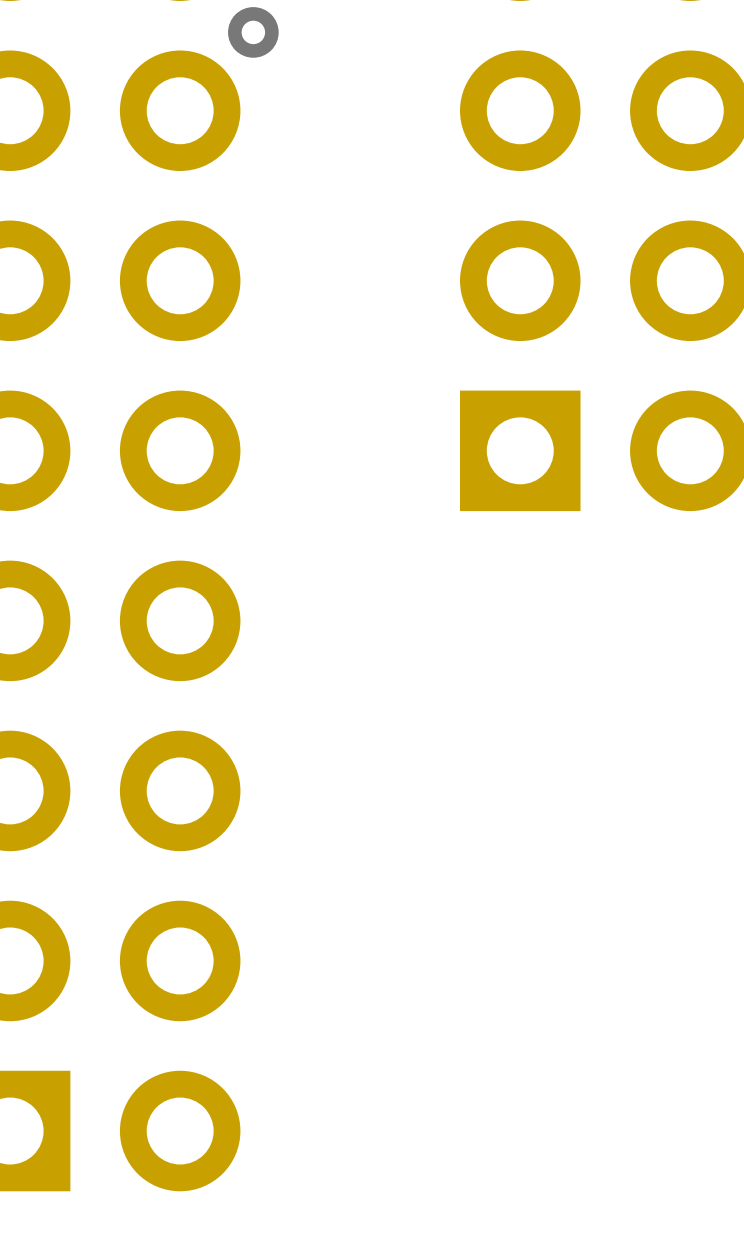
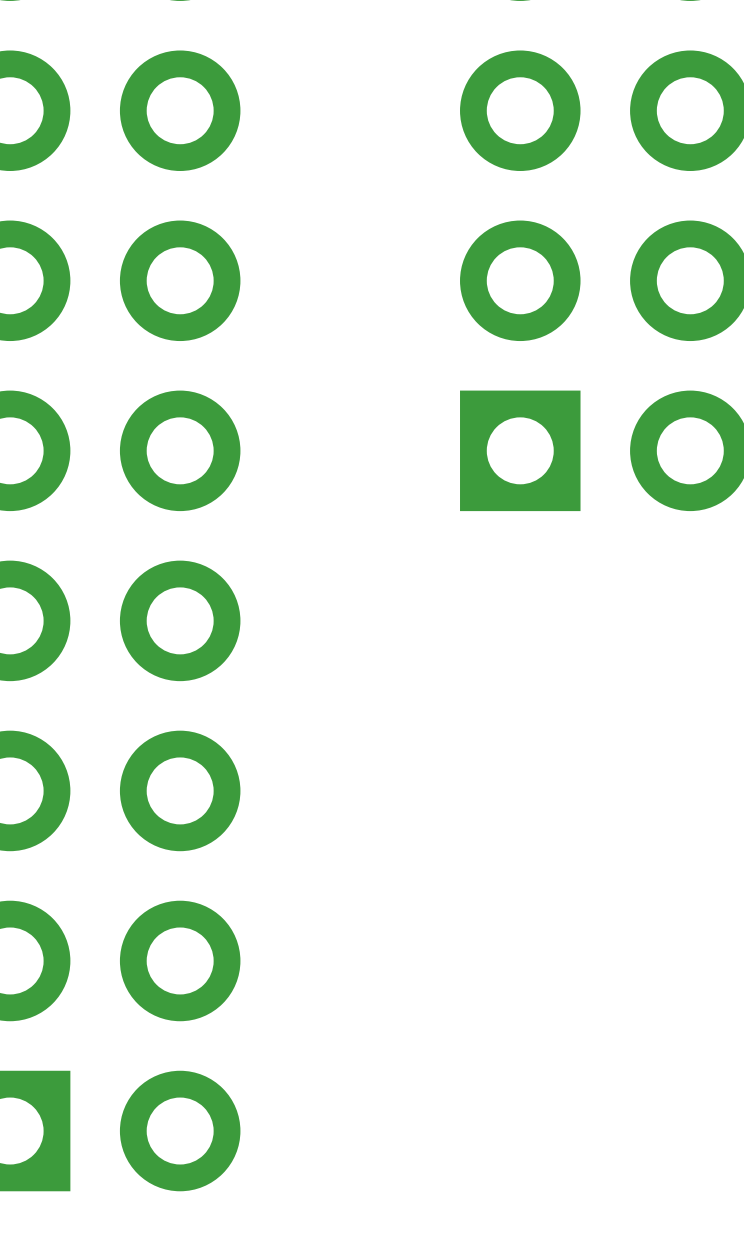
via: (253, 32) -> none

